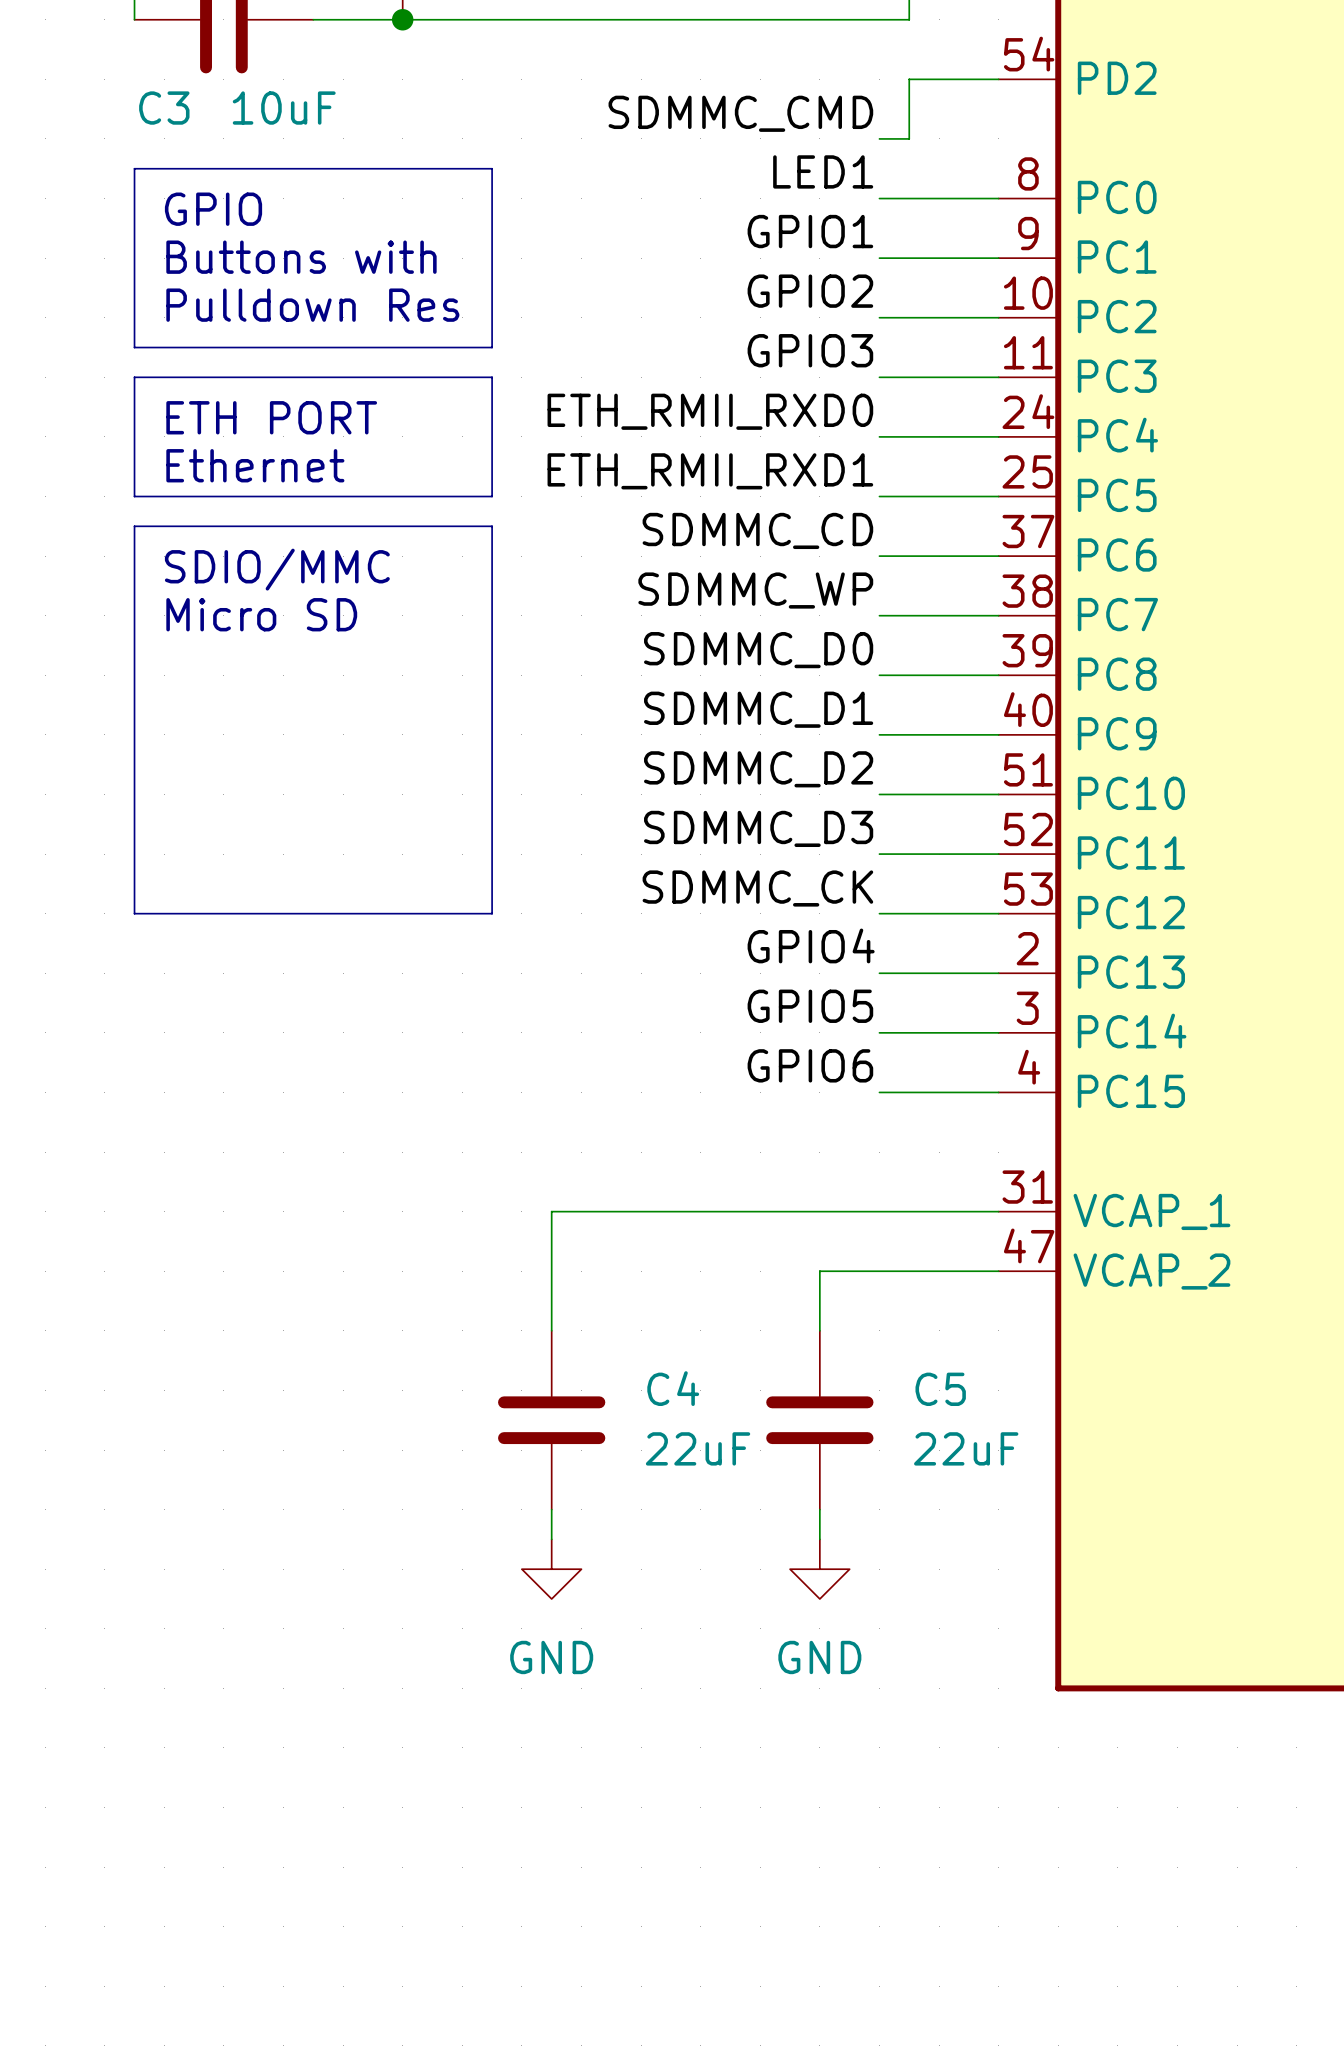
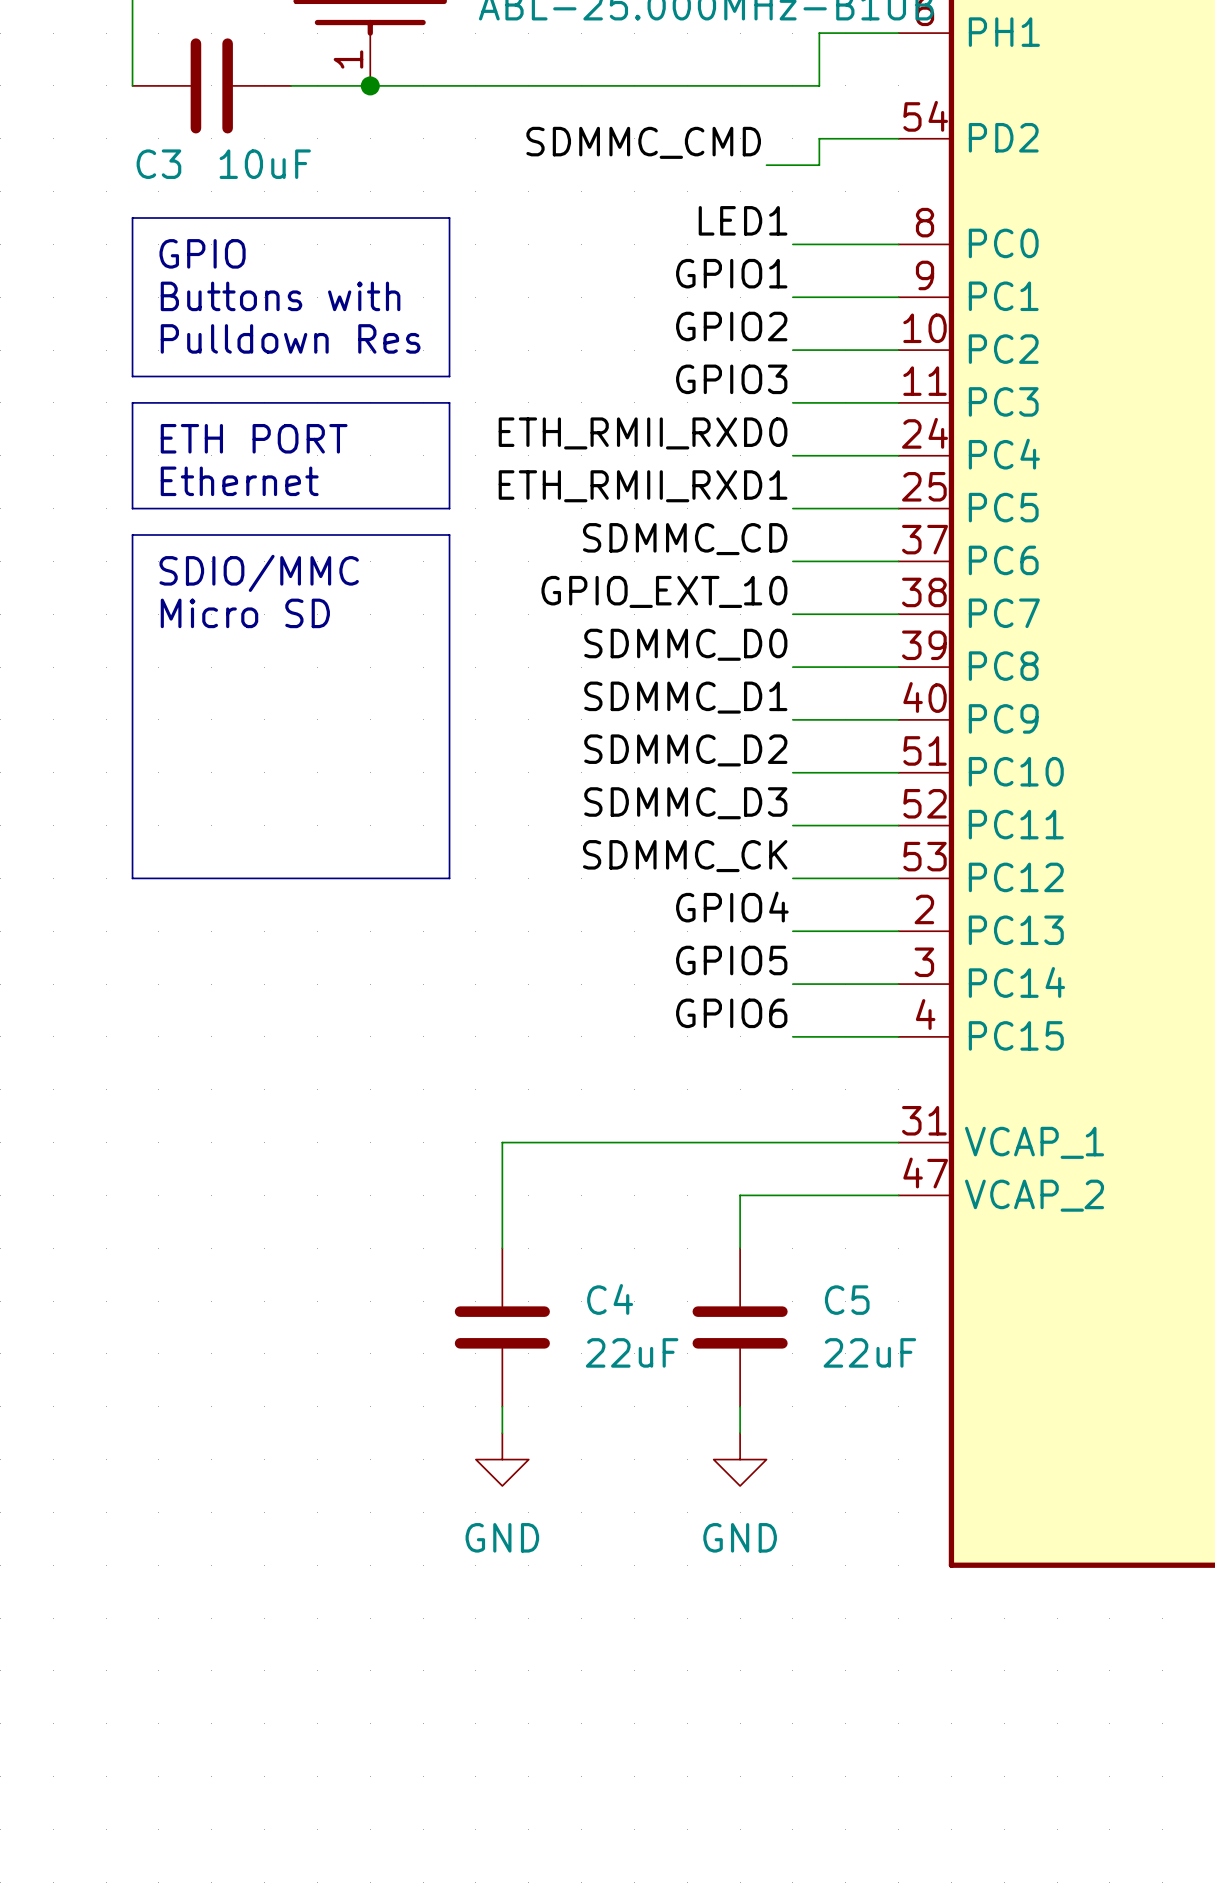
wire: (909, 109) (909, 138) (879, 138) -> (819, 165) (766, 165)
label position: SDMMC_CMD (740, 113) -> SDMMC_CMD (643, 142)
label: SDMMC_WP (755, 590) -> GPIO_EXT_10 (664, 591)

